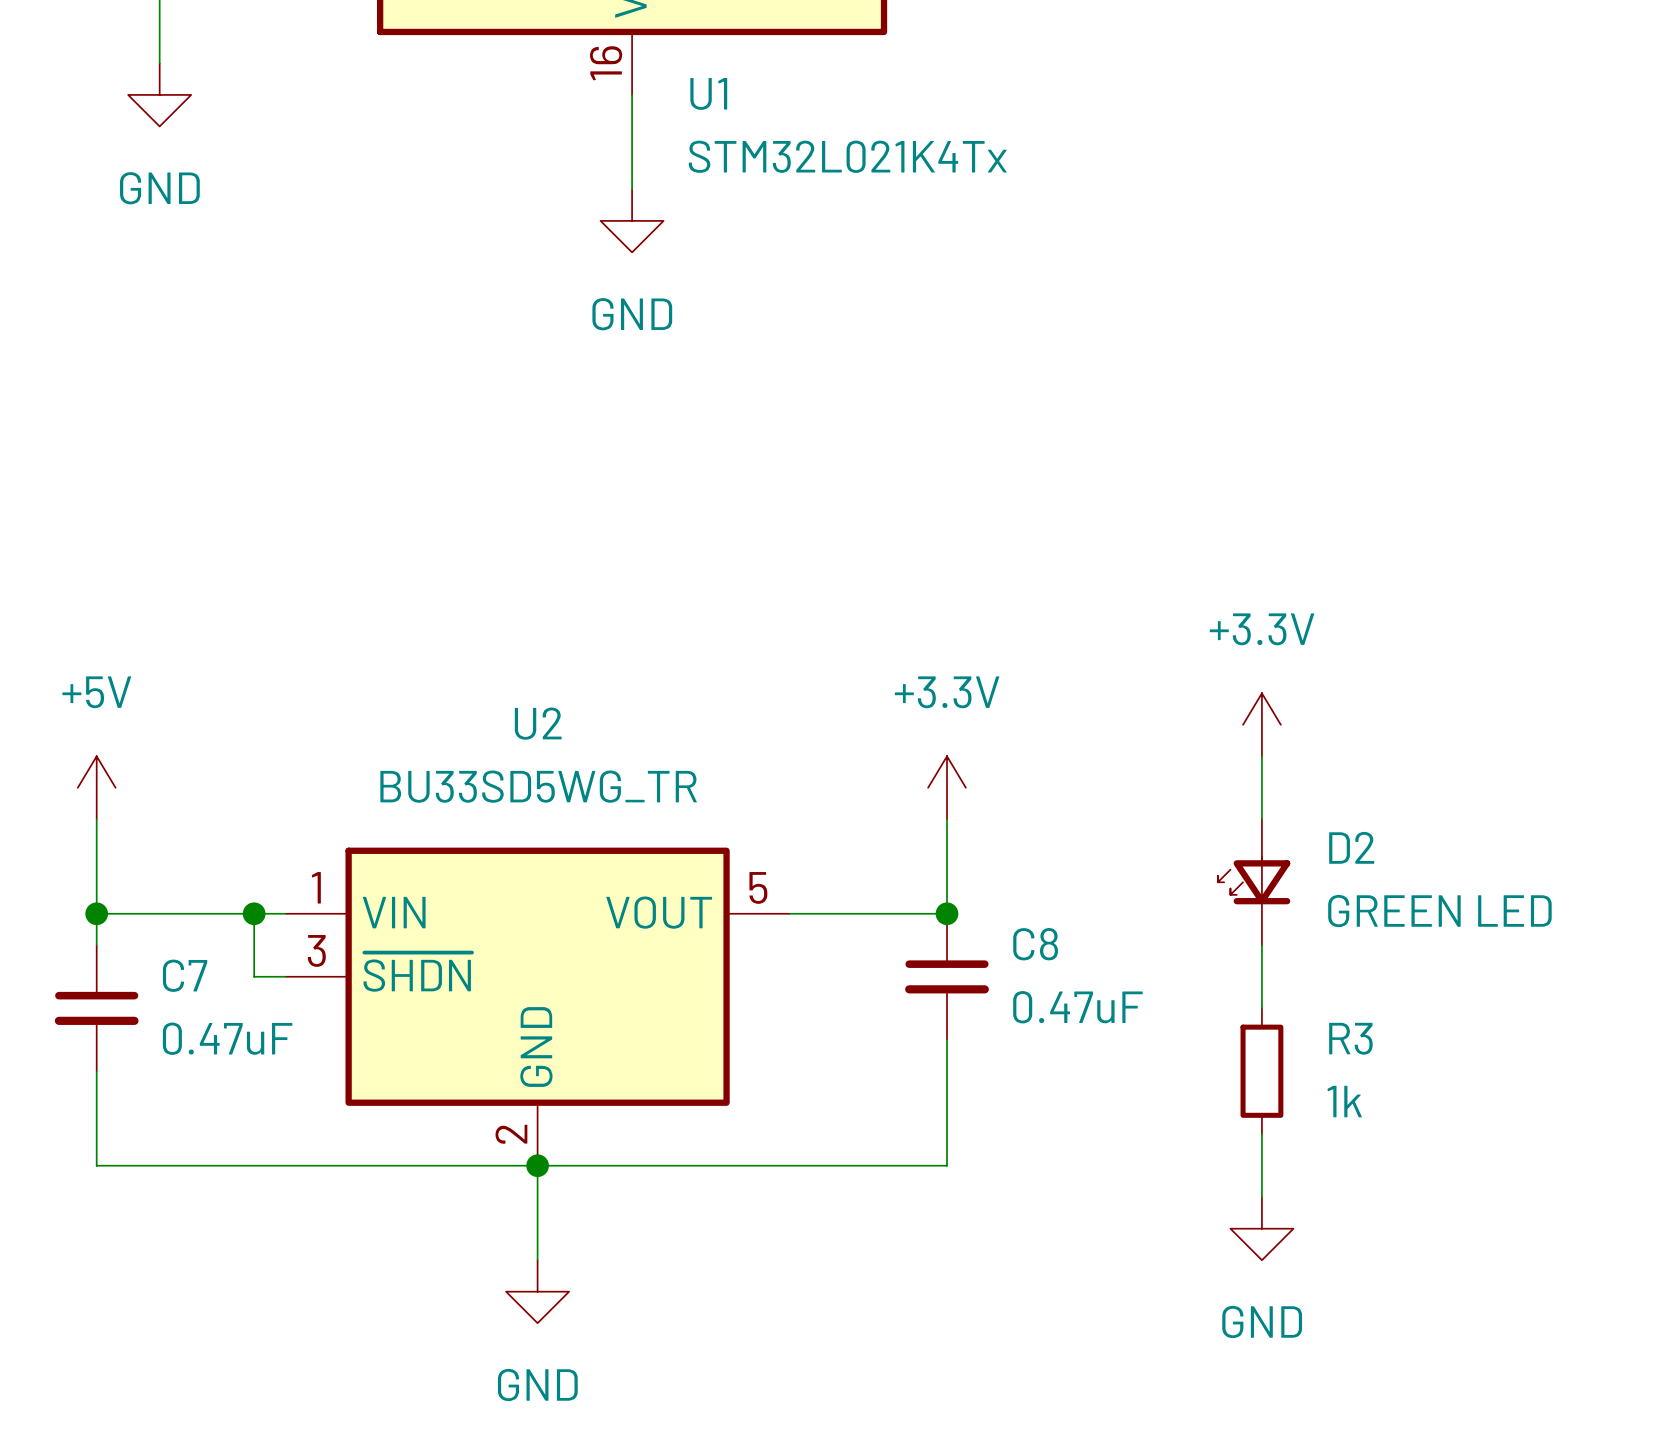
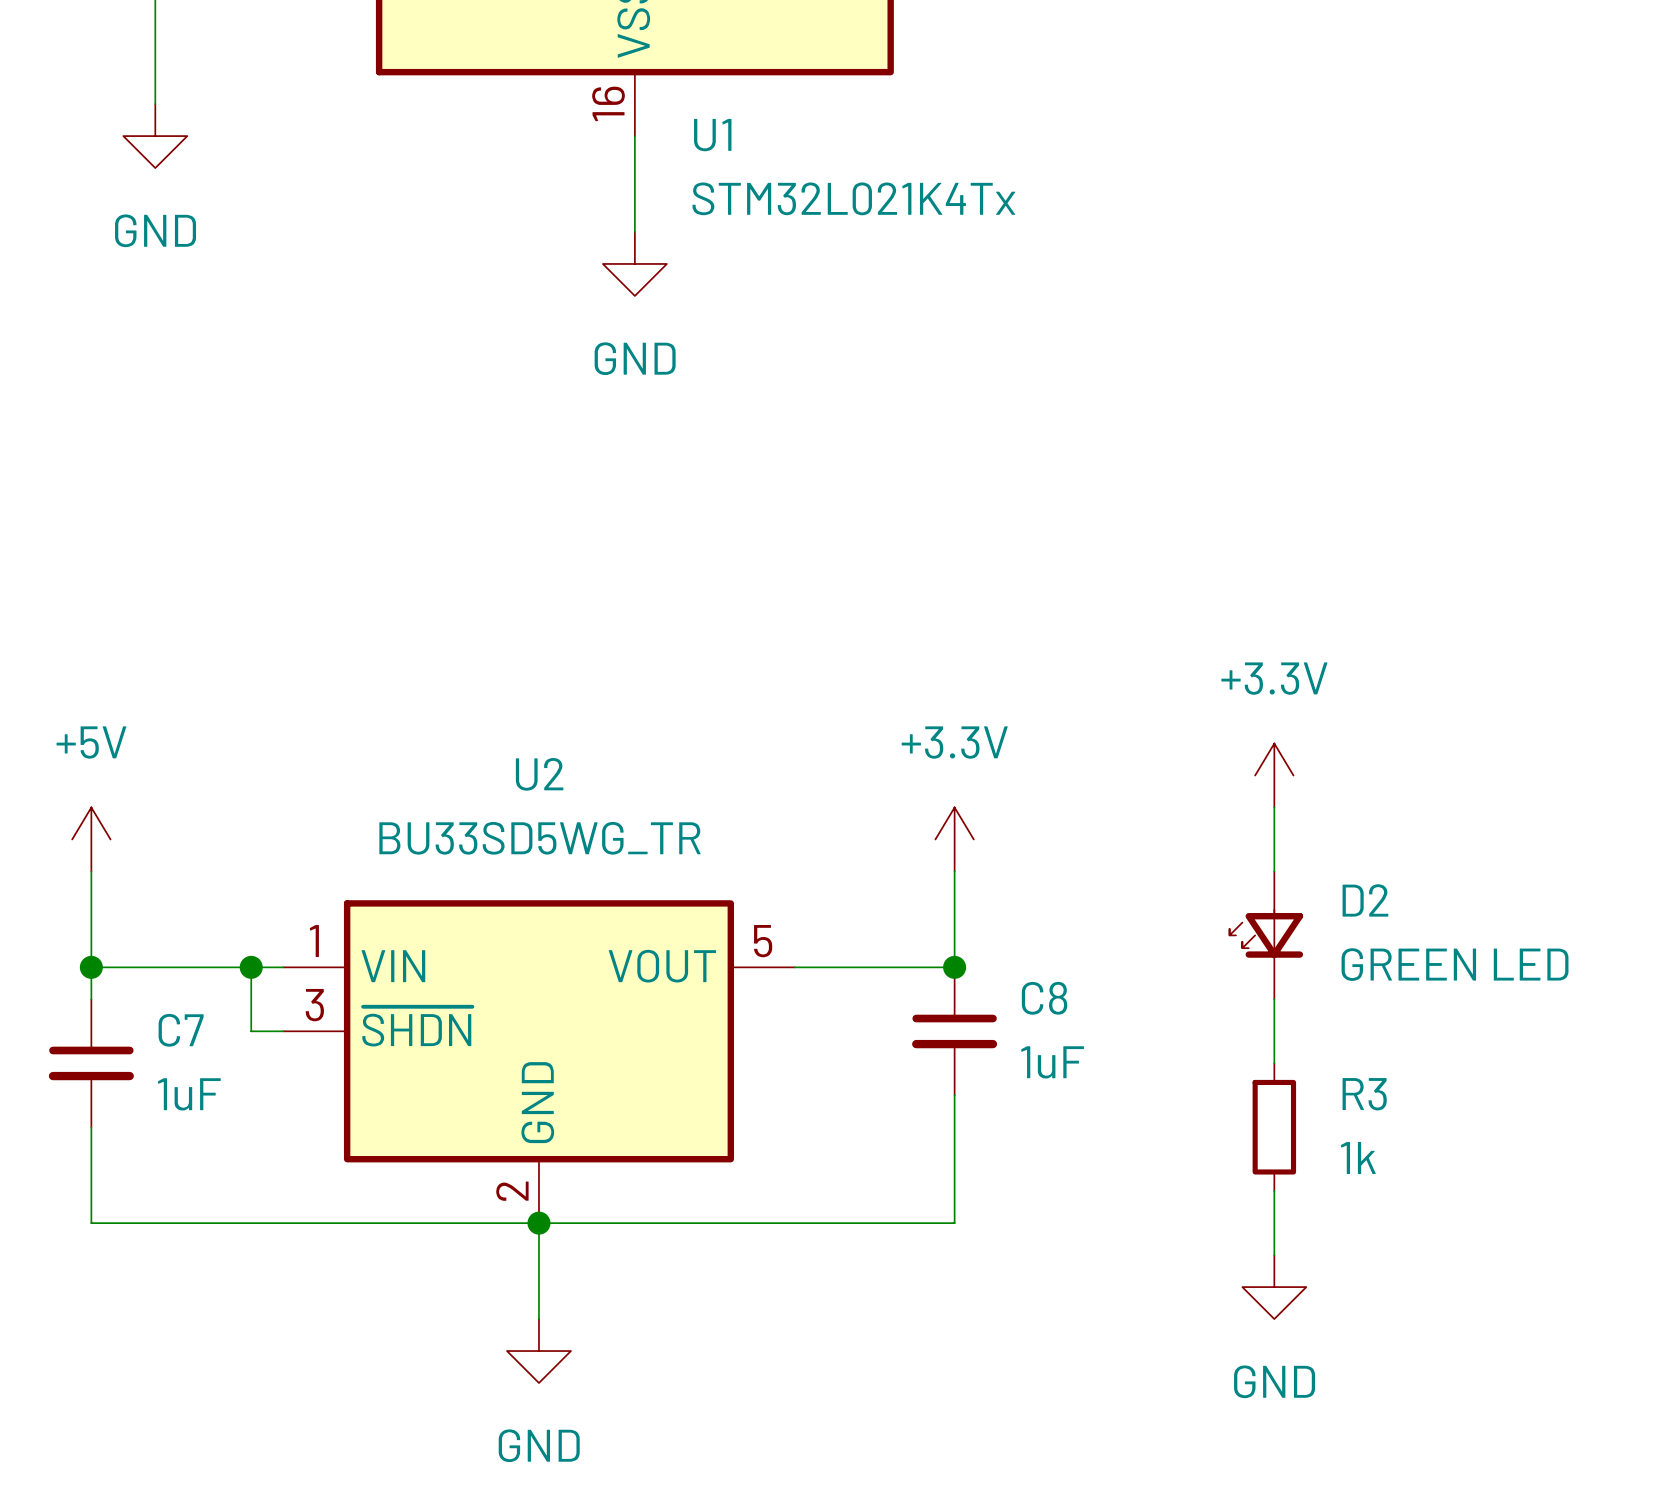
C8 value: 0.47uF (1077, 1007) -> 1uF (1052, 1062)
C7 value: 0.47uF (227, 1038) -> 1uF (189, 1094)

